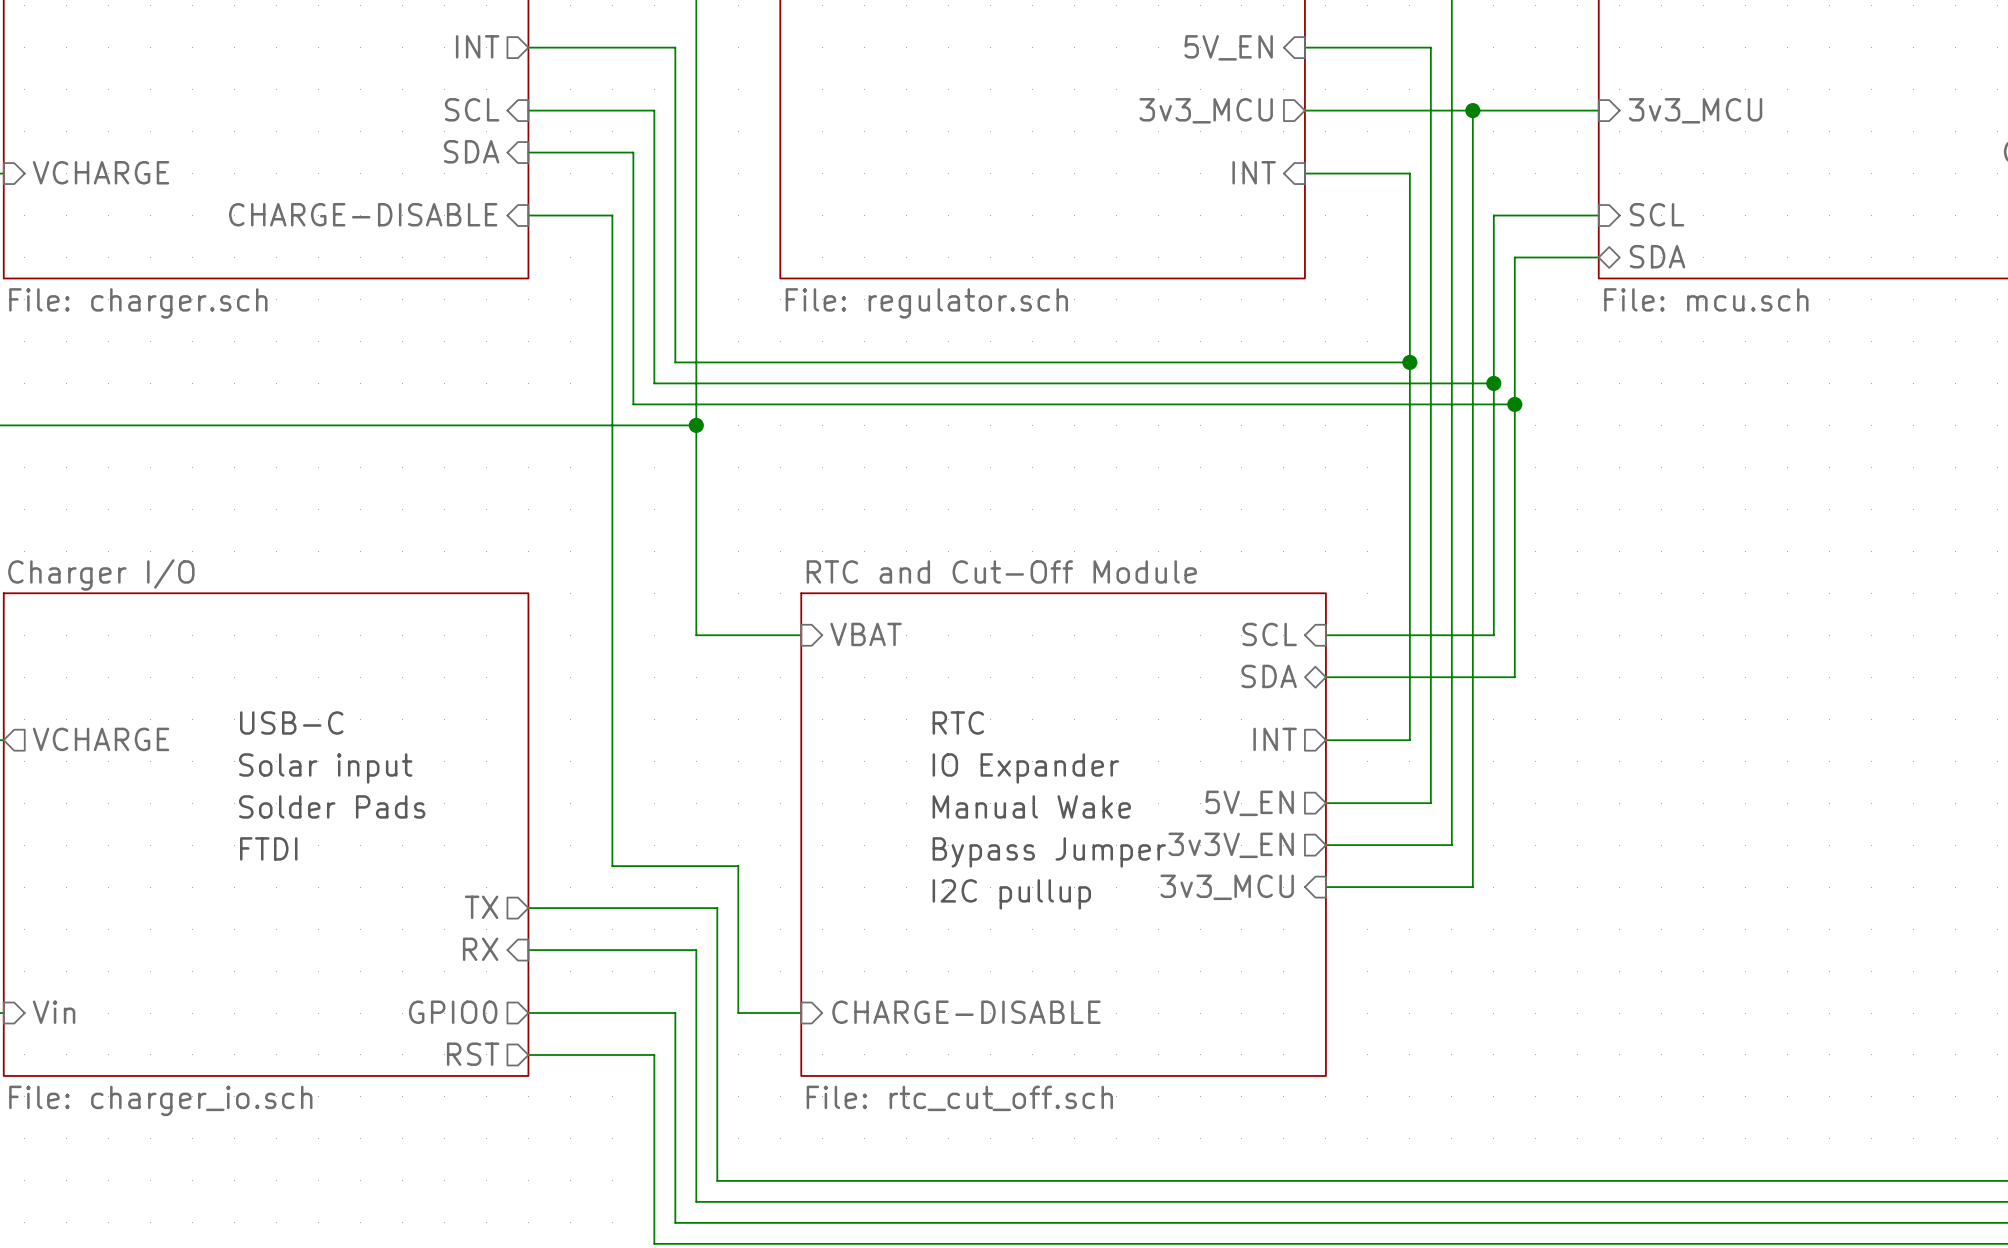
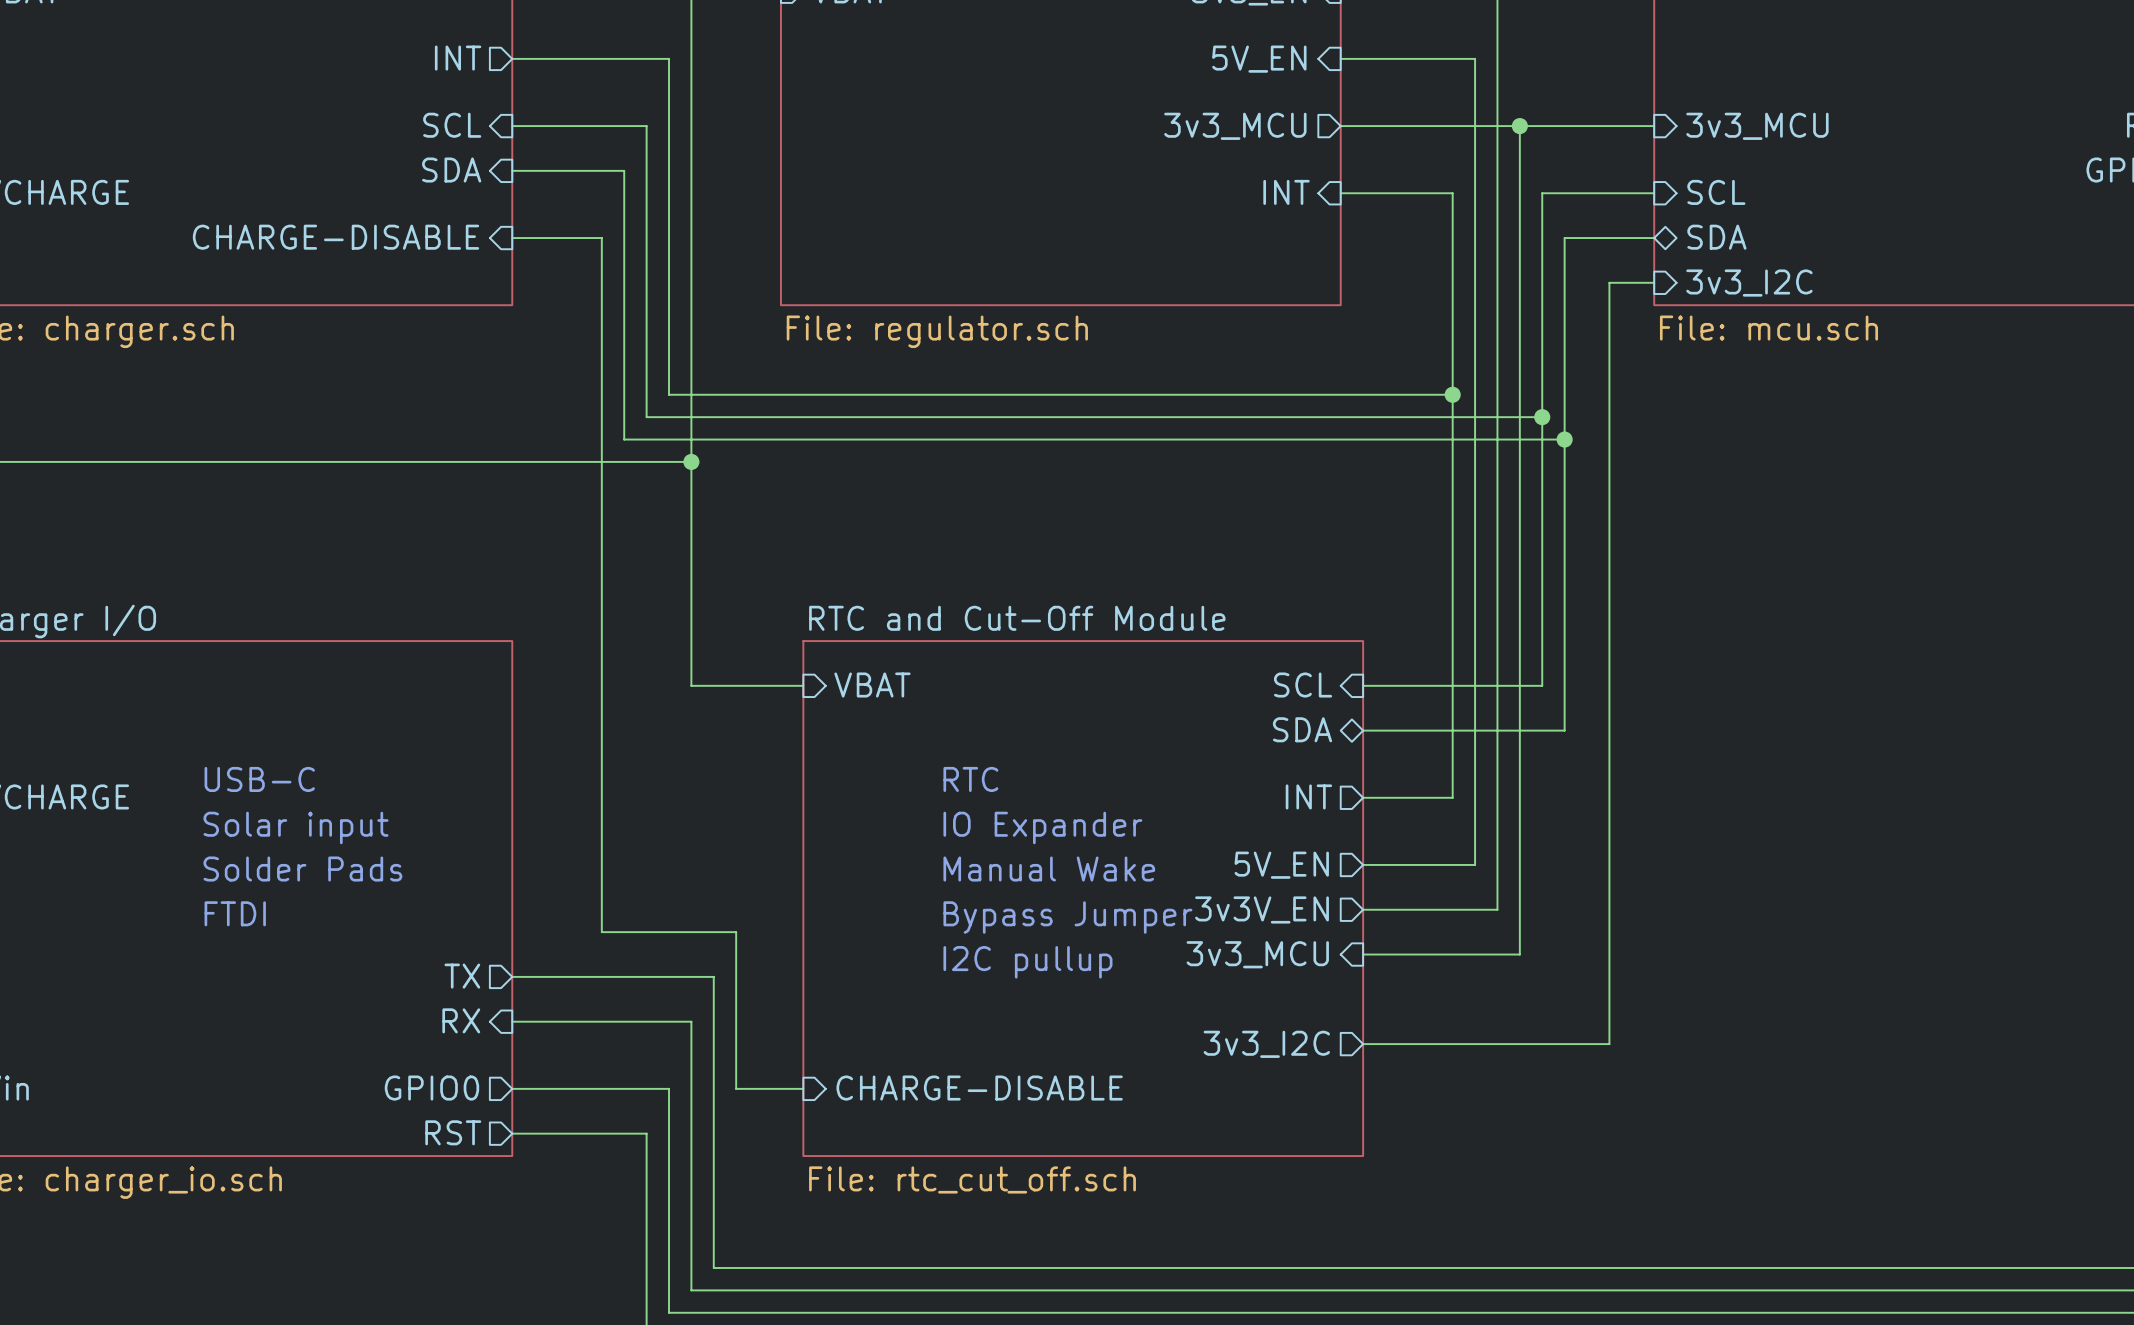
sheet pin: none -> SCL (1716, 192)
wire: none -> (1654, 193) (1542, 193) (1542, 238)
sheet pin shape: input (1657, 214) -> bidirectional (1716, 237)
sheet pin: SCL (1657, 214) -> SDA (1716, 237)
wire: (1493, 215) (1514, 215) -> (1564, 282) (1564, 238)
sheet pin shape: bidirectional (1657, 256) -> input (1749, 283)
sheet pin: SDA (1657, 256) -> 3v3_I2C (1749, 283)
wire: (1514, 257) (1556, 257) -> (1363, 1044) (1609, 1044) (1609, 282)
sheet pin: none -> 3v3_I2C (1266, 1044)

